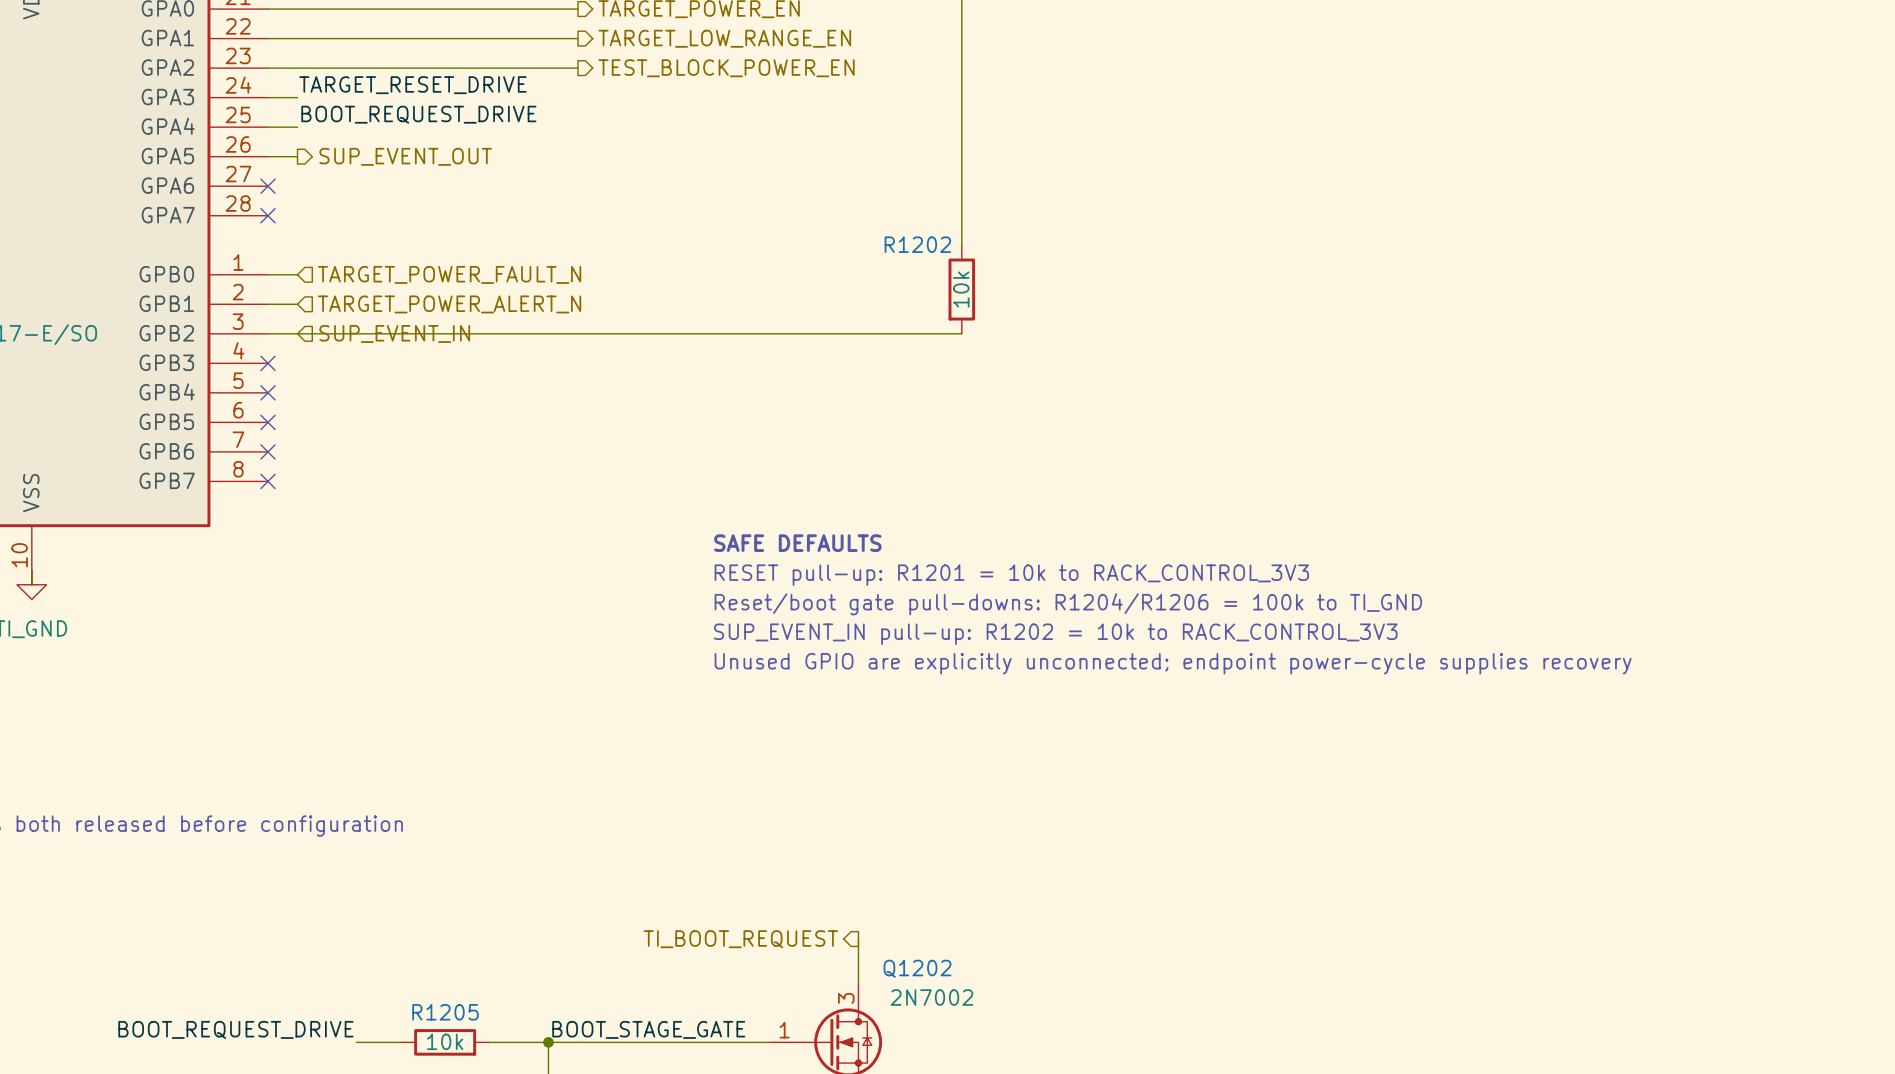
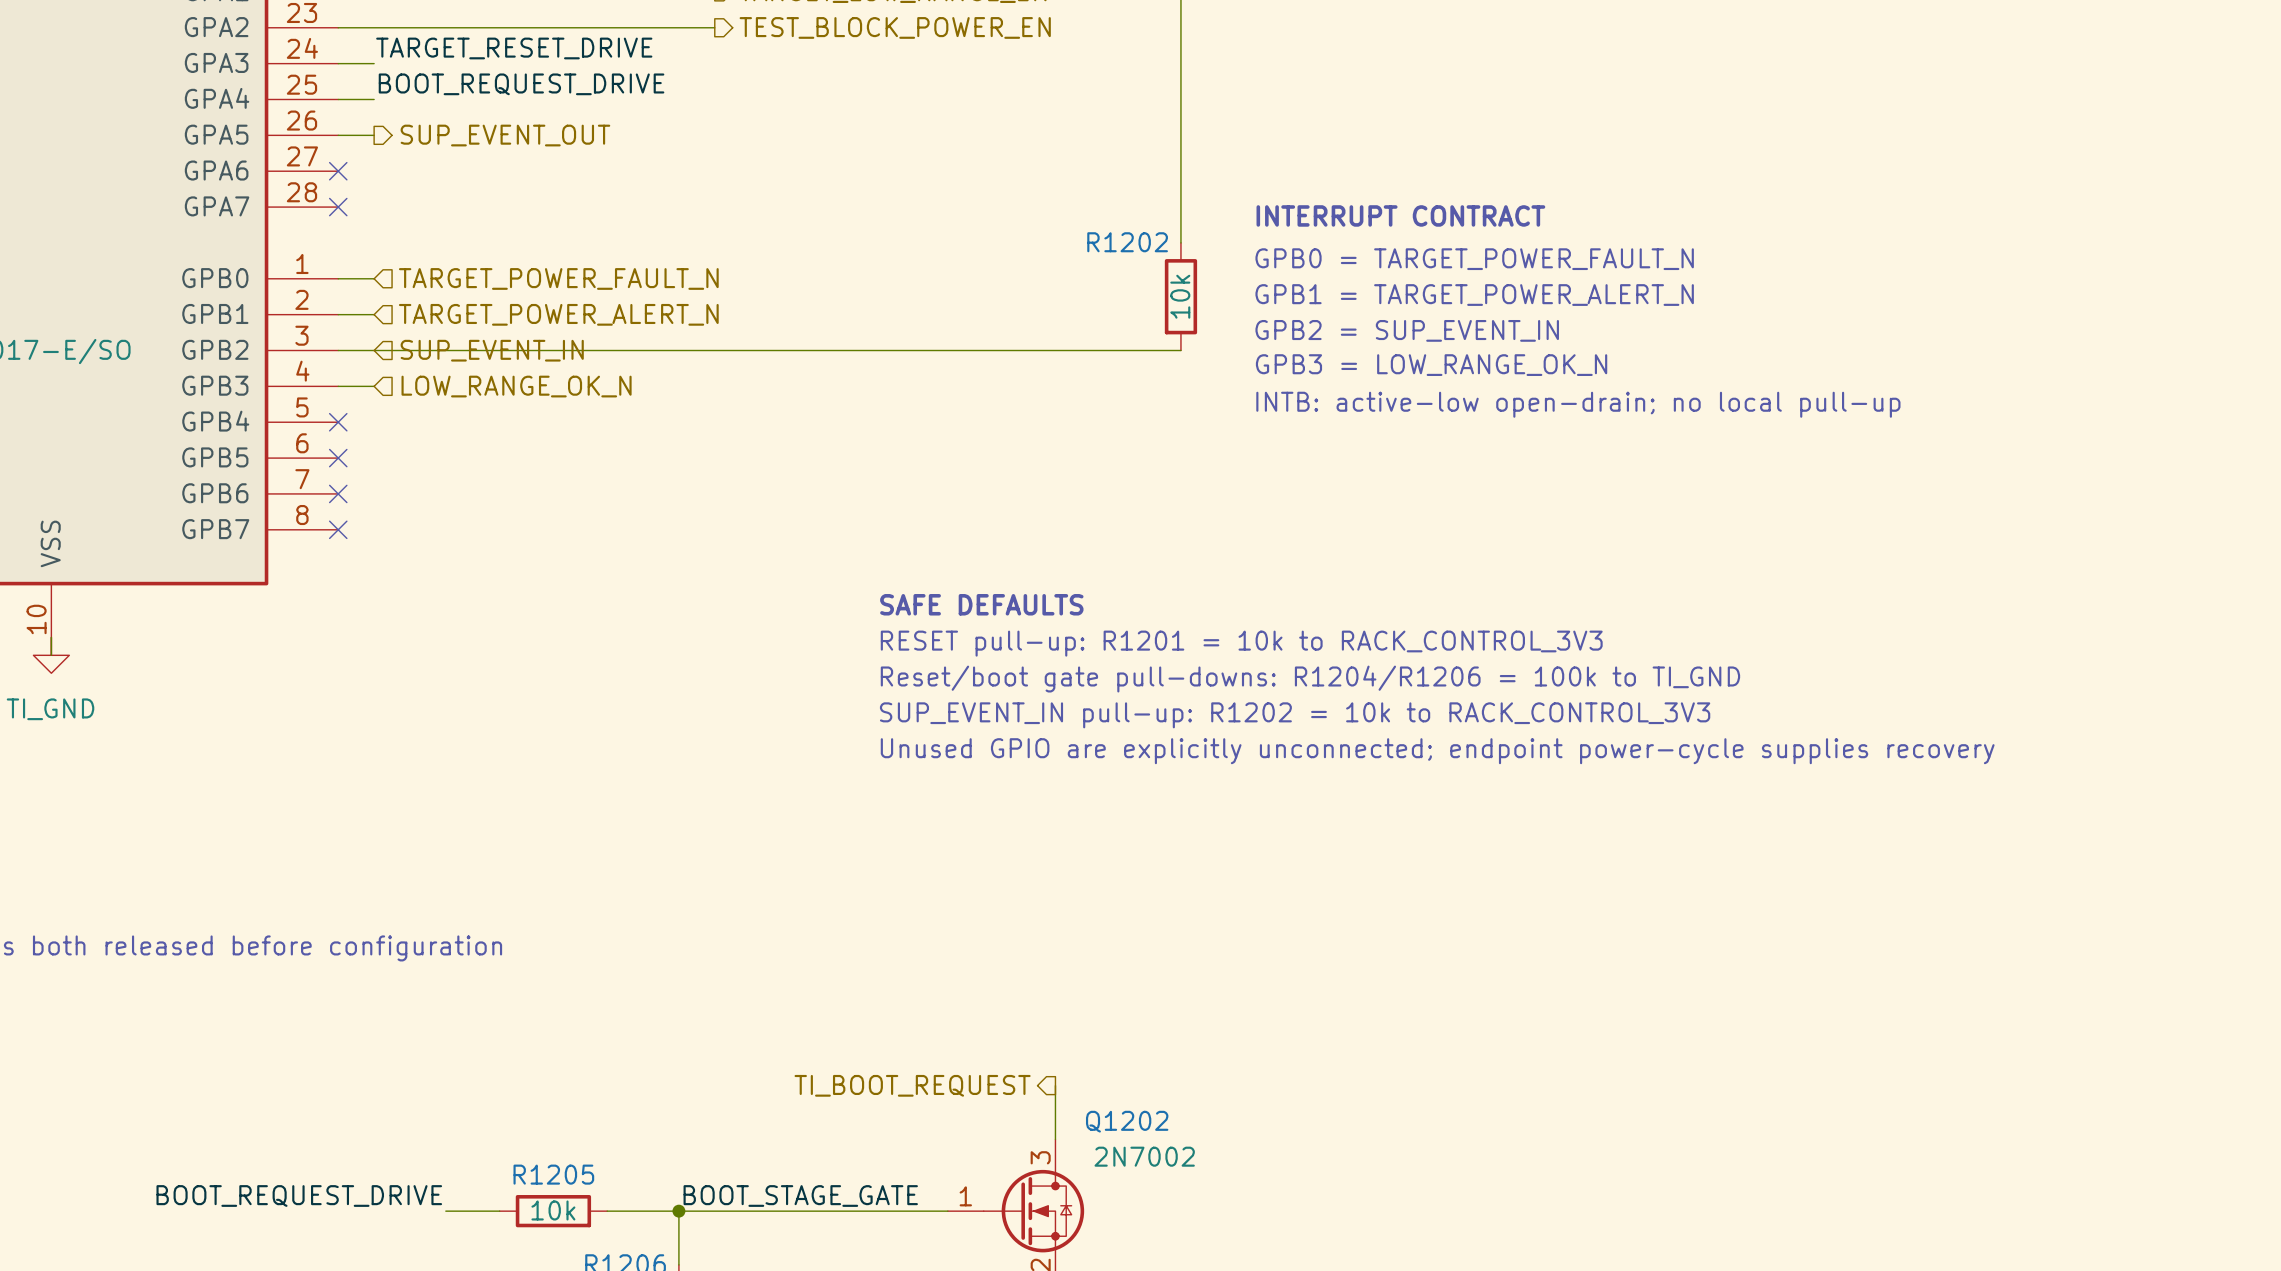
text: none -> INTERRUPT CONTRACT (1400, 215)
text: none -> GPB0 = TARGET_POWER_FAULT_N (1474, 259)
text: none -> GPB1 = TARGET_POWER_ALERT_N (1474, 295)
text: none -> GPB2 = SUP_EVENT_IN (1407, 330)
text: none -> GPB3 = LOW_RANGE_OK_N (1431, 365)
wire: none -> (338, 386) (374, 386)
no-connect mark: (268, 363) -> none
hierarchical label: none -> LOW_RANGE_OK_N (516, 386)
text: none -> INTB: active-low open-drain; no local pull-up (1578, 404)

